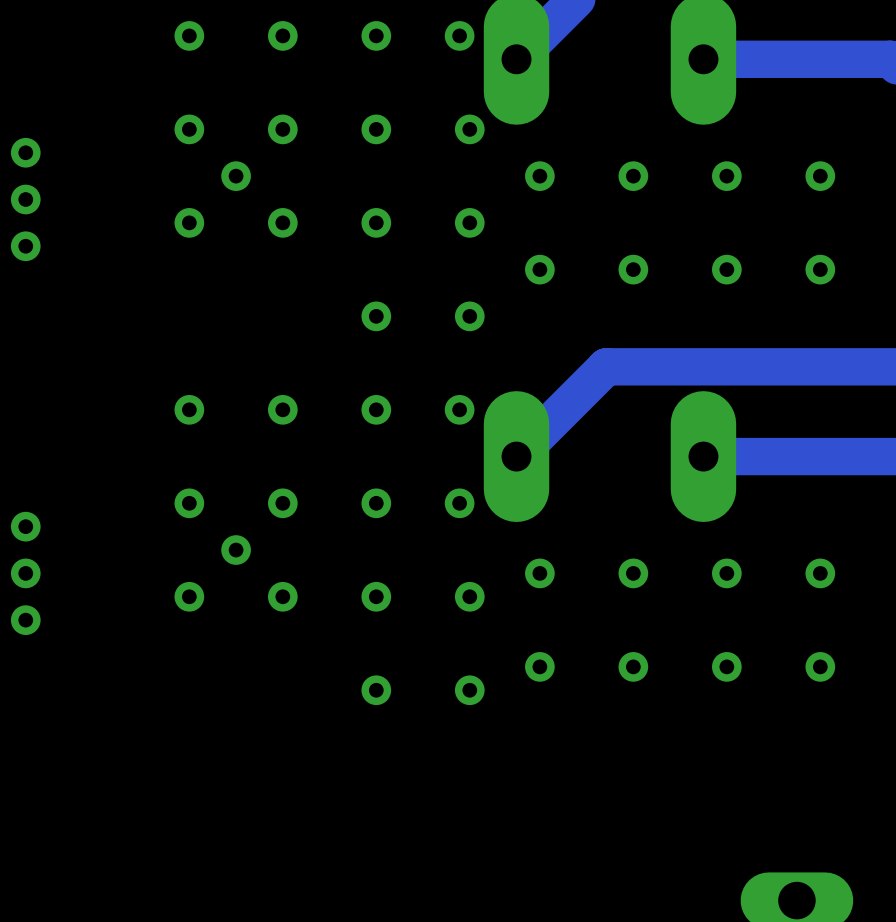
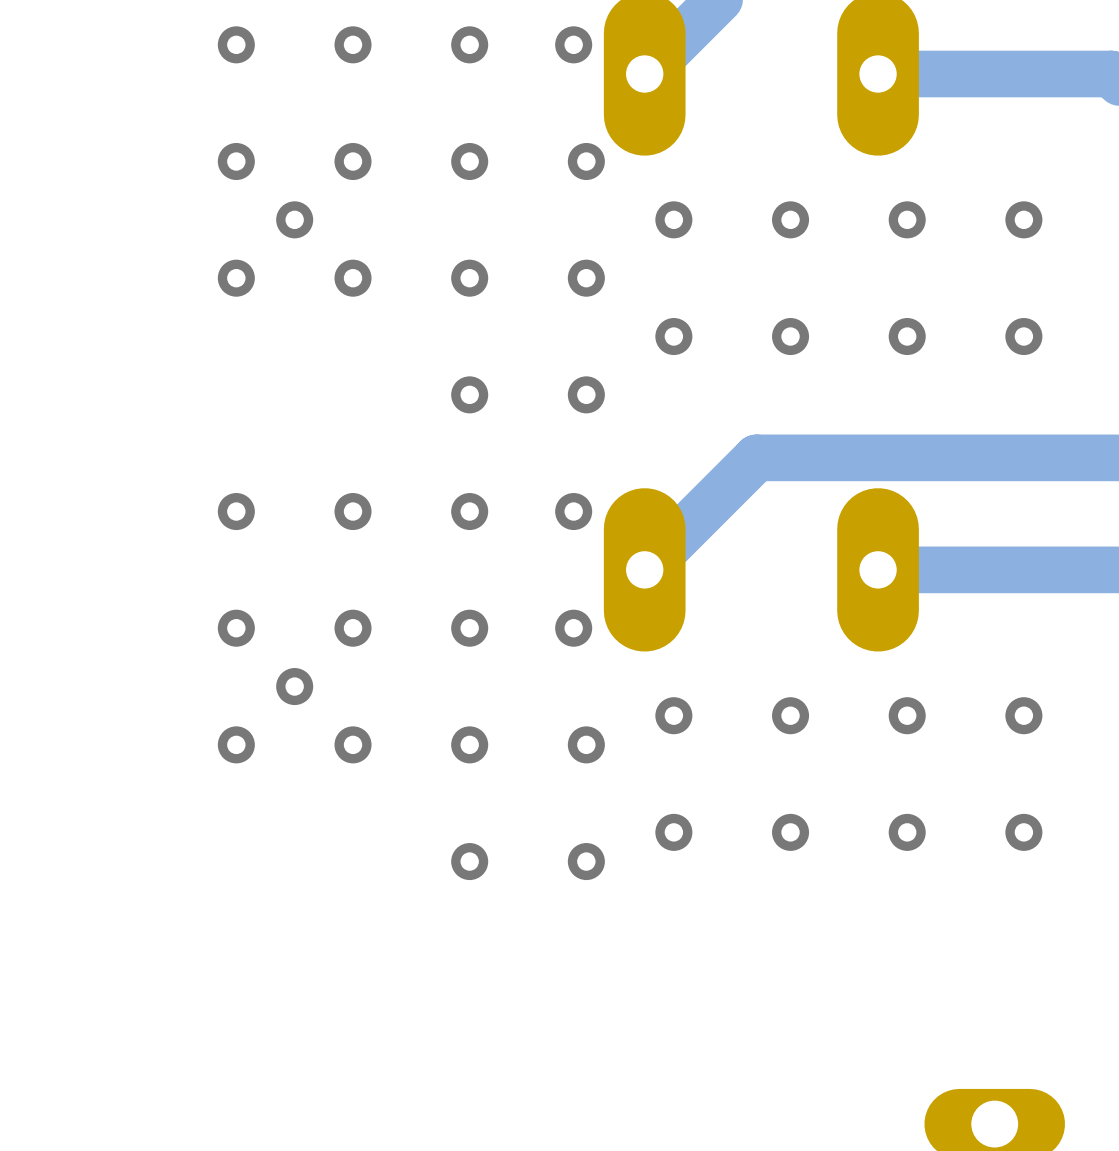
via: (25, 152) -> none
via: (25, 199) -> none
via: (25, 246) -> none
via: (25, 526) -> none
via: (25, 573) -> none
via: (25, 620) -> none

